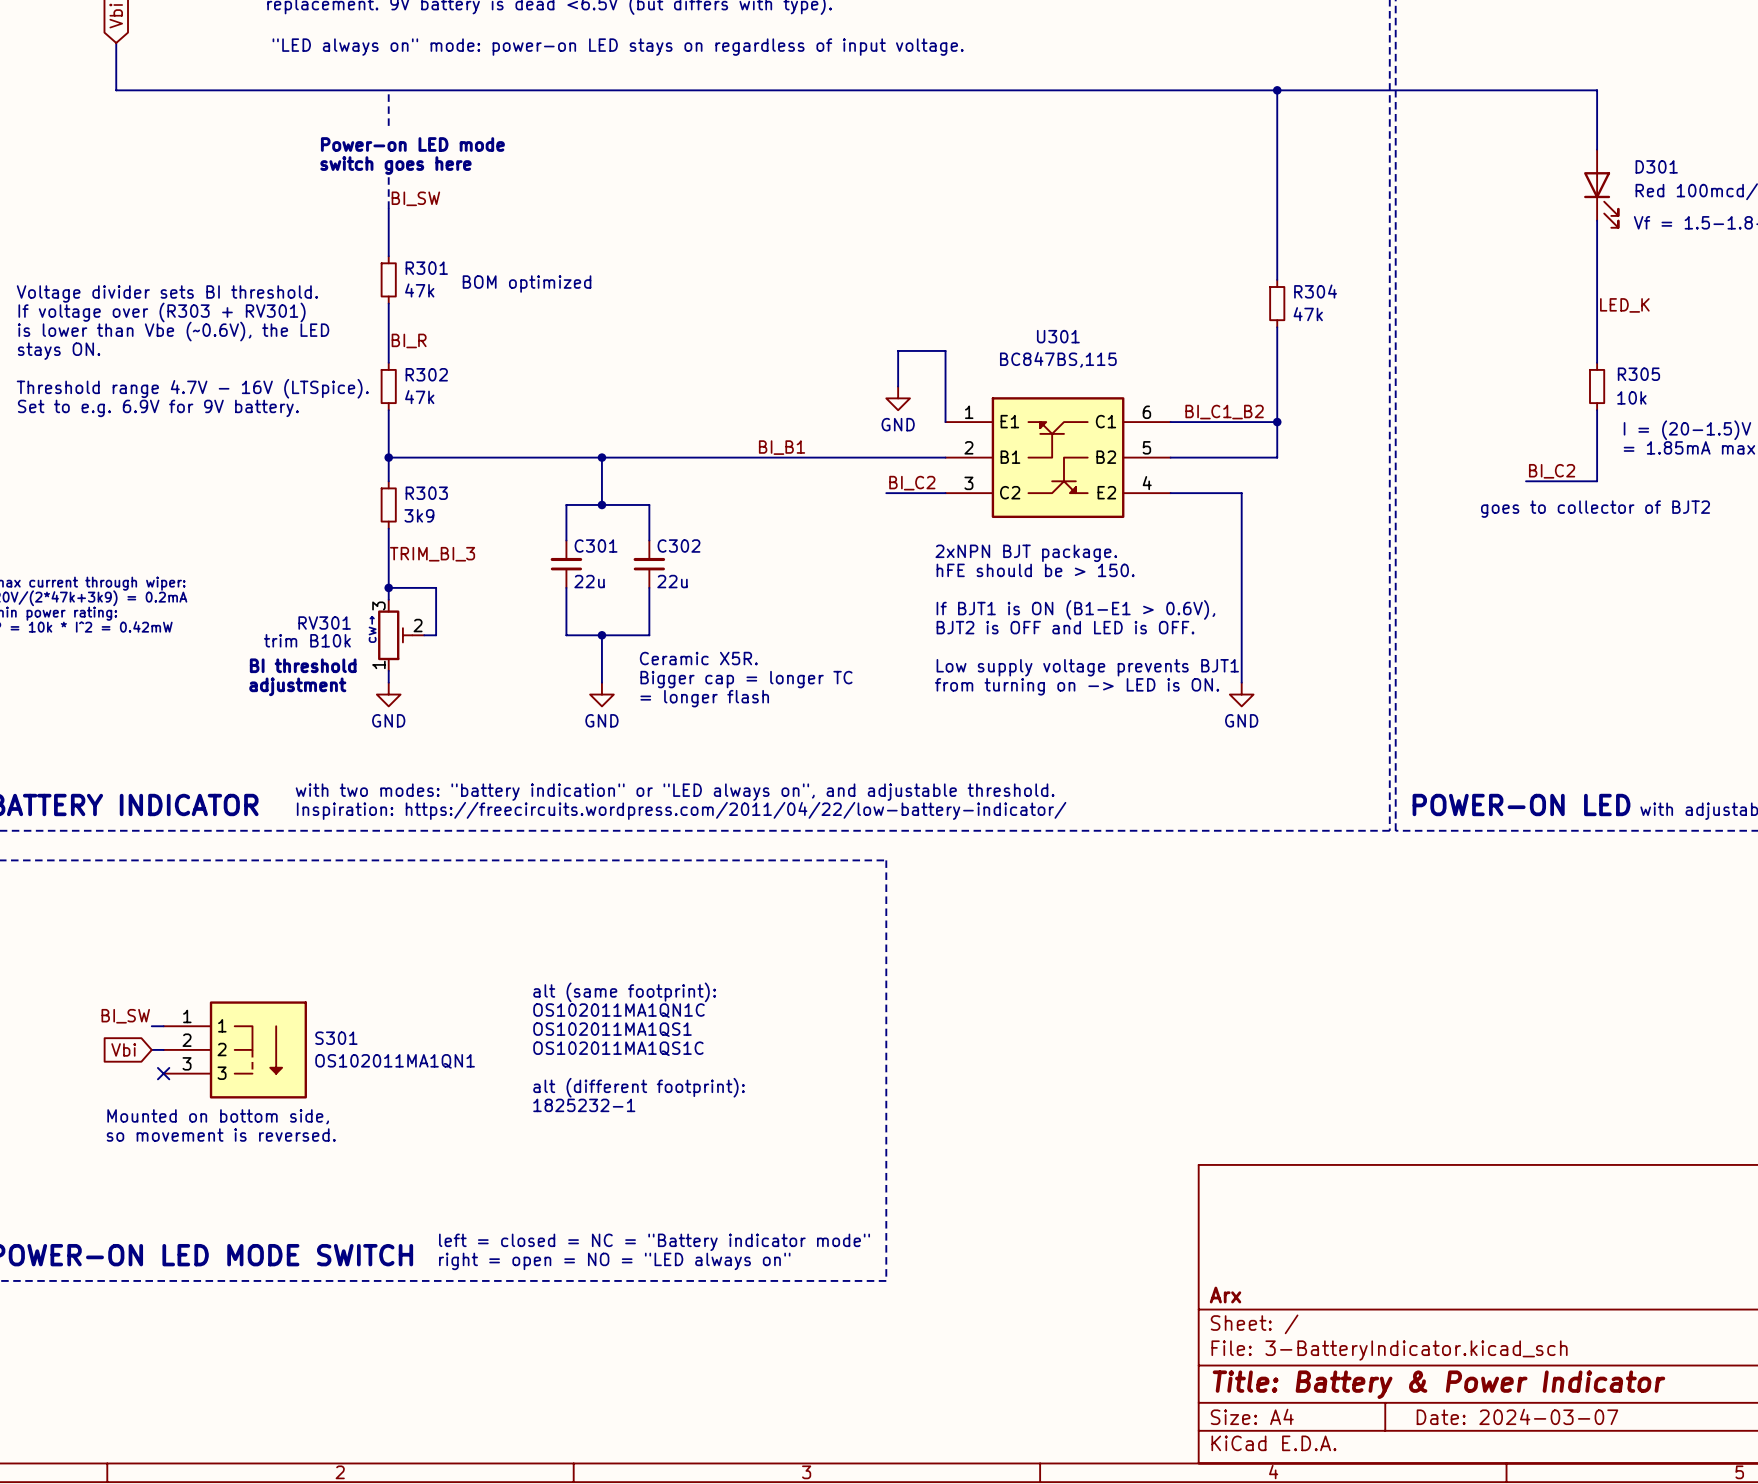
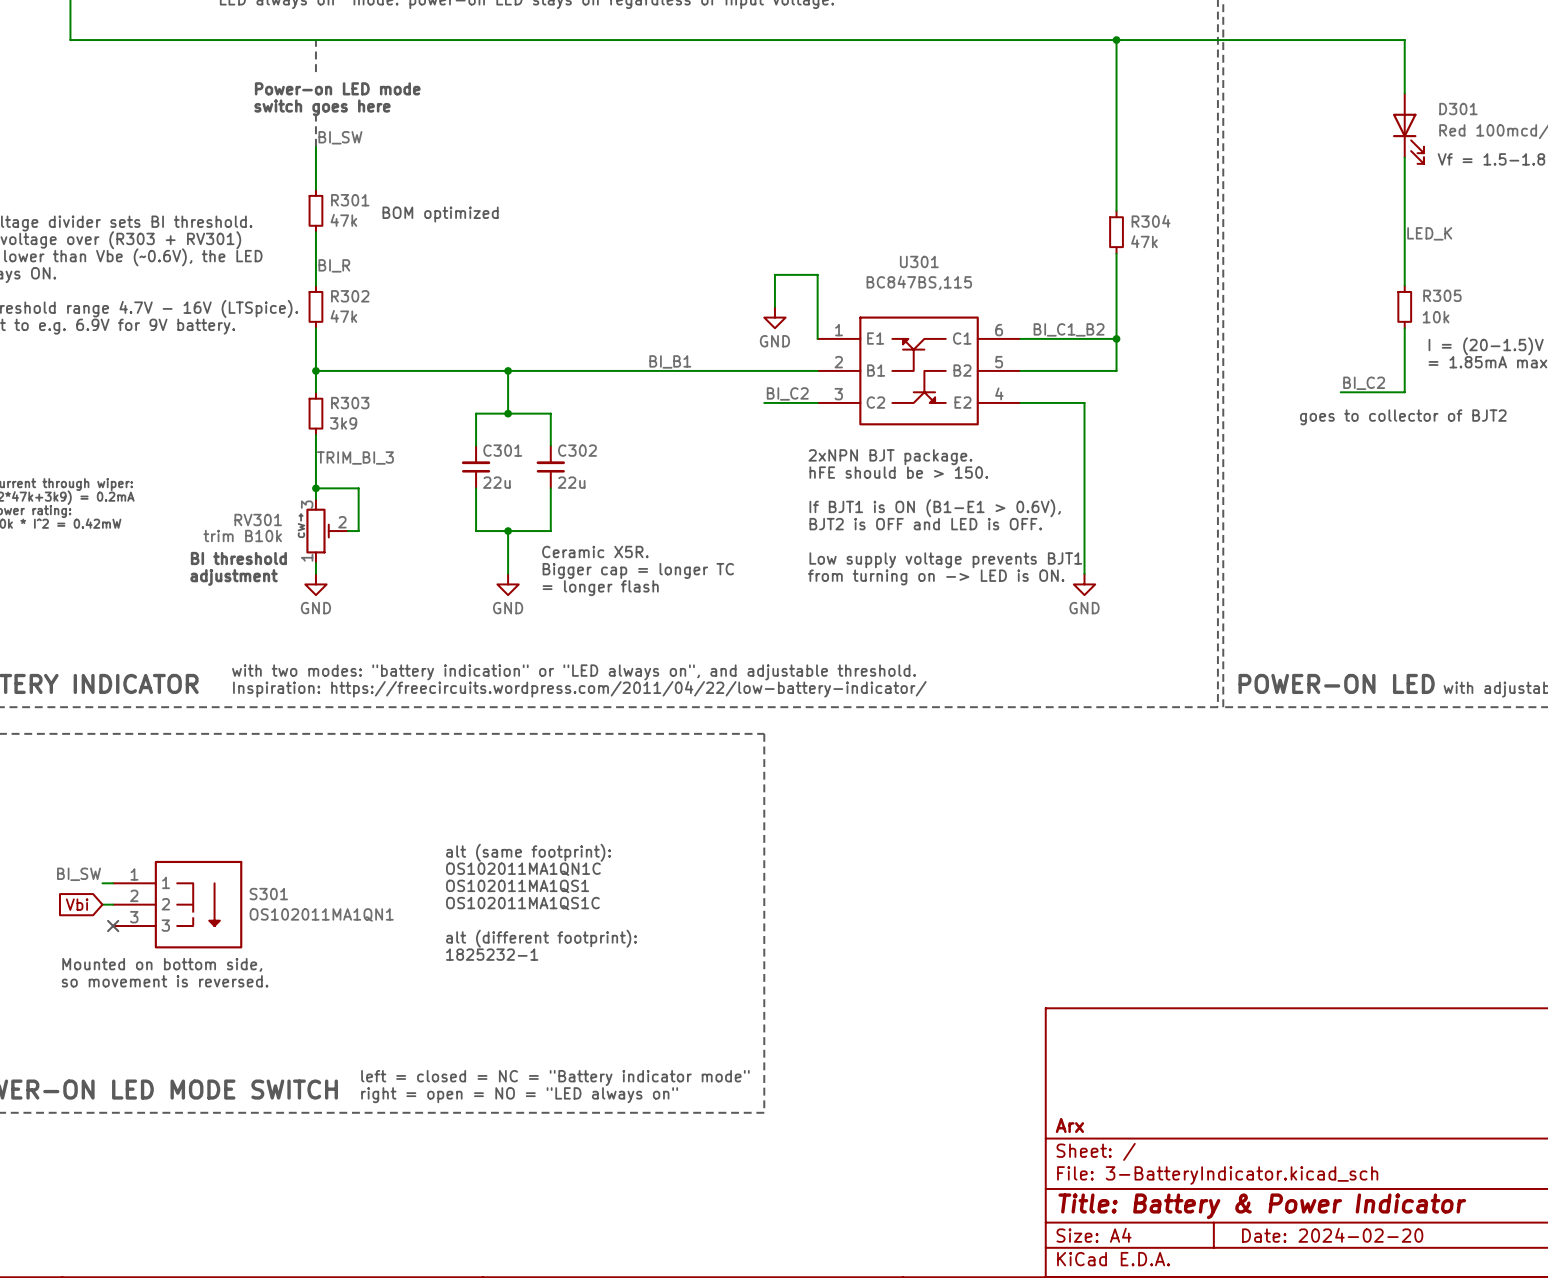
title block: Date: 2024-03-07 (1517, 1416) -> Date: 2024-02-20 (1332, 1235)

